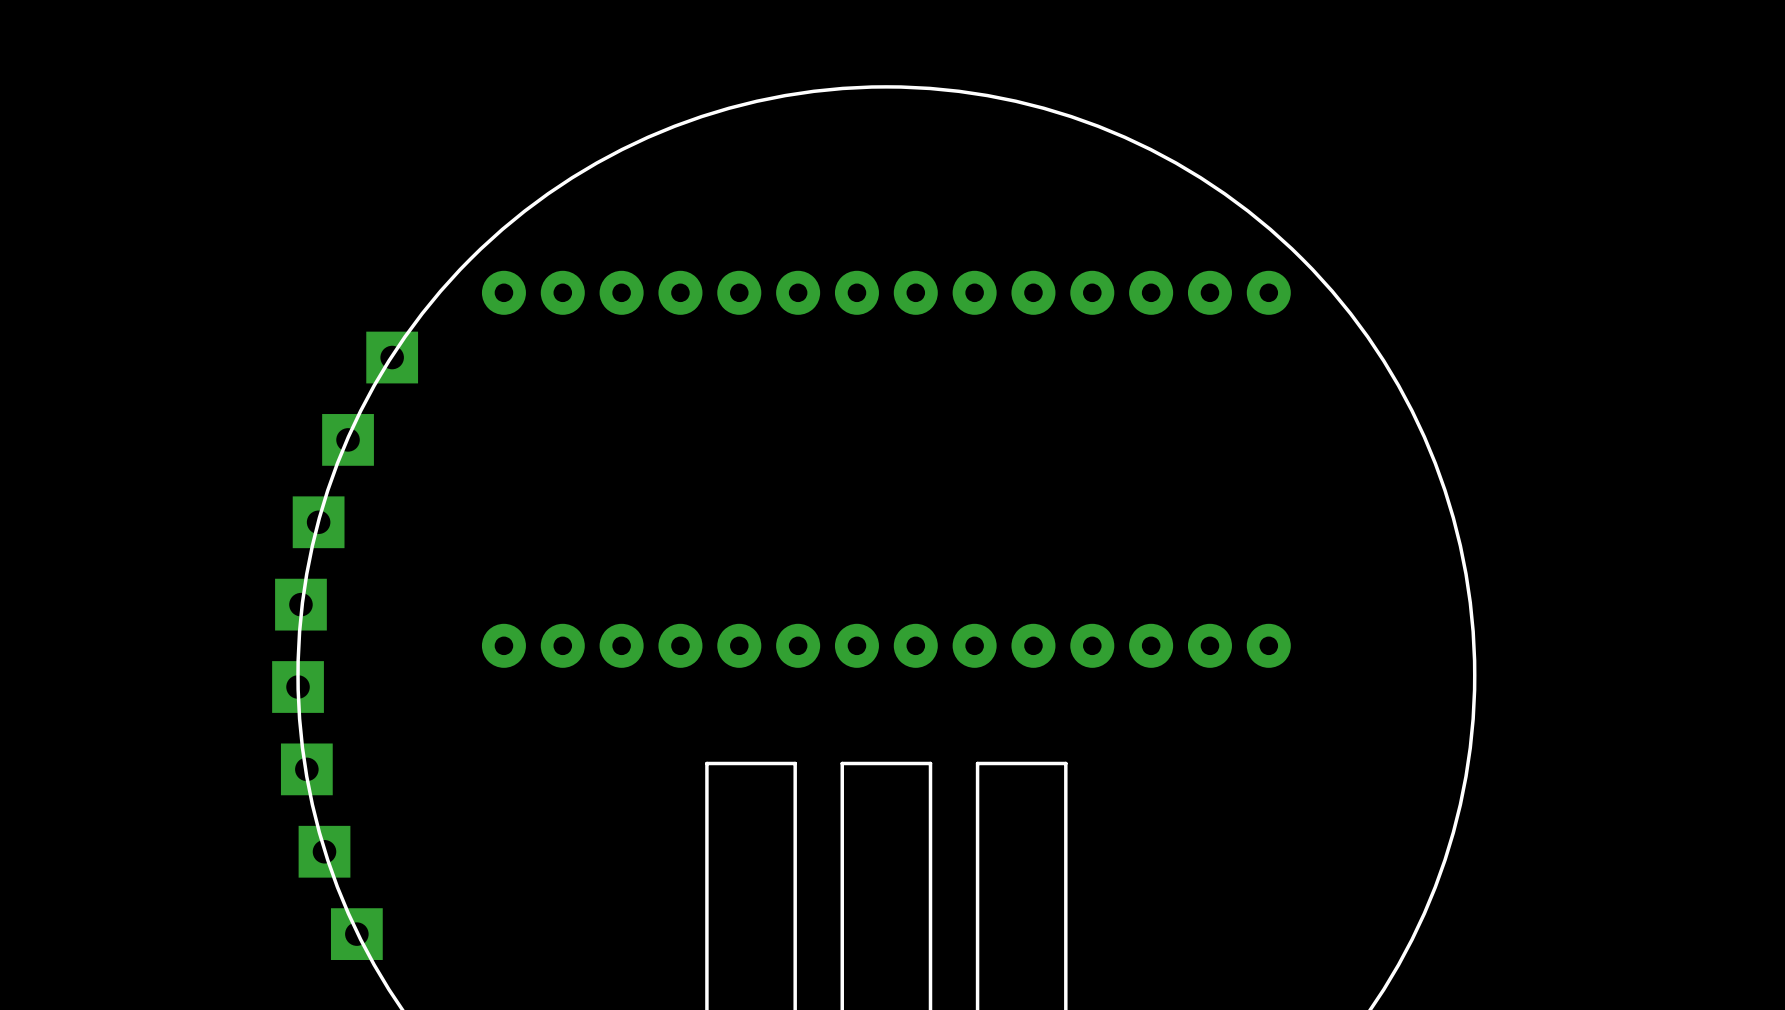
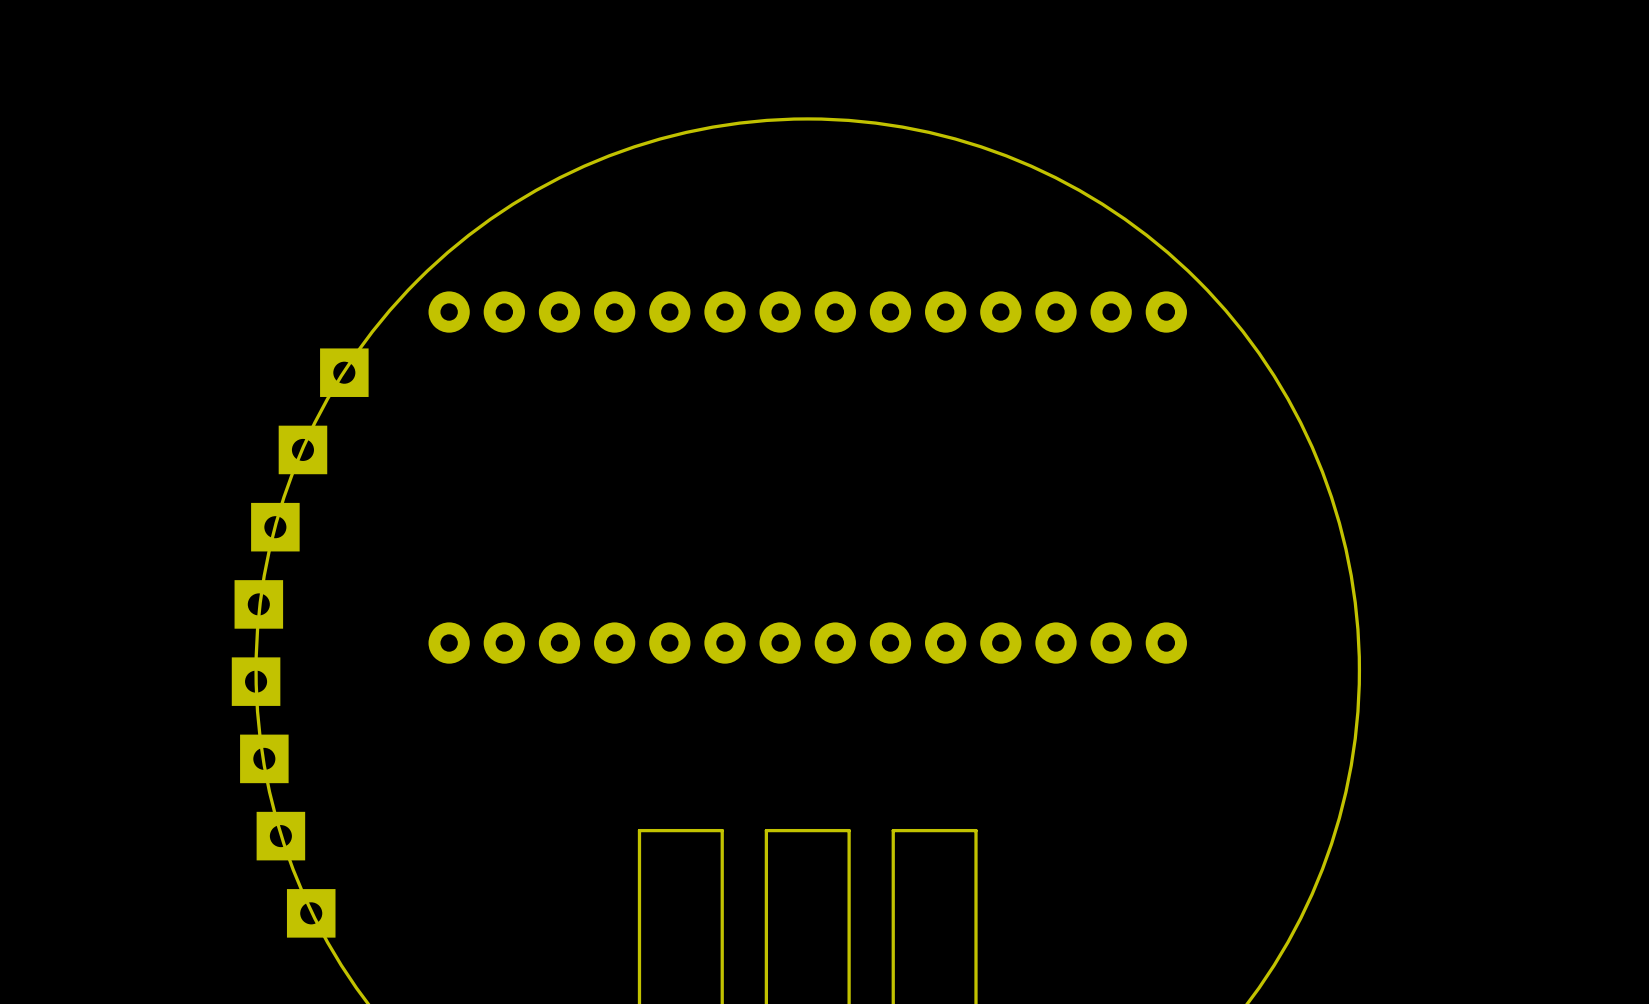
board edge: (795, 845) (795, 763) (706, 763) (706, 845) -> (722, 830) (639, 830)
board edge: (930, 845) (930, 763) (842, 763) (842, 845) -> (849, 830) (766, 830)
board edge: (1065, 845) (1065, 763) (977, 763) (977, 845) -> (976, 830) (893, 830)

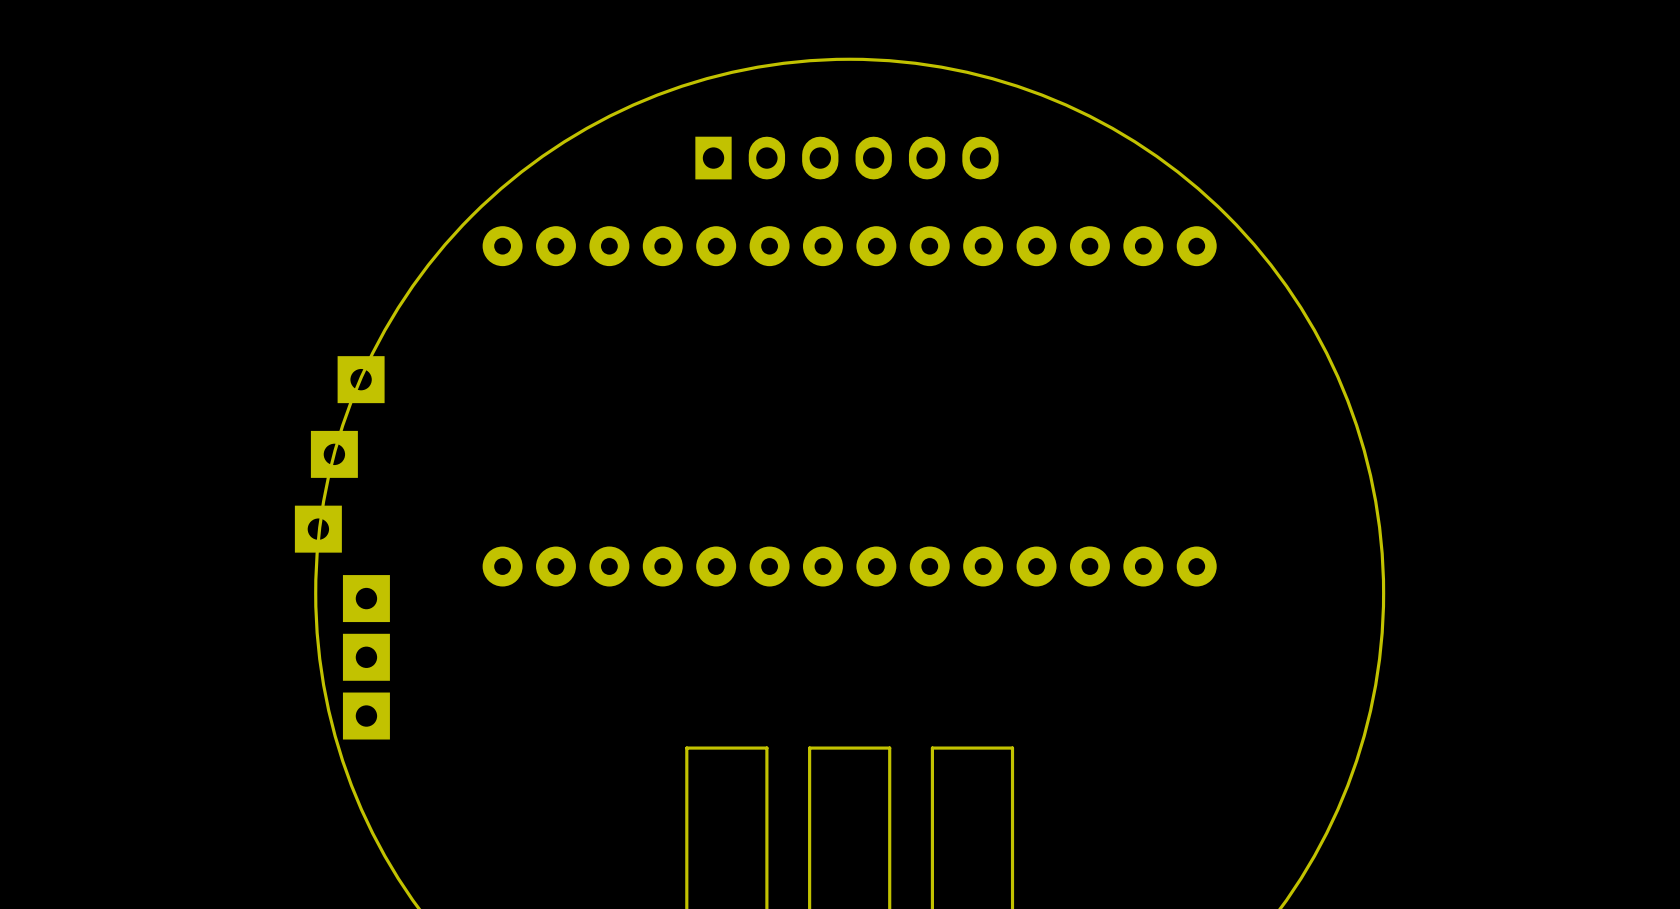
part: none -> (846, 158)
part: (344, 372) -> none
part: none -> (366, 598)
part: (256, 681) -> none
part: none -> (366, 657)
part: (264, 758) -> none
part: none -> (366, 716)
part: (280, 836) -> none
part: (311, 913) -> none

